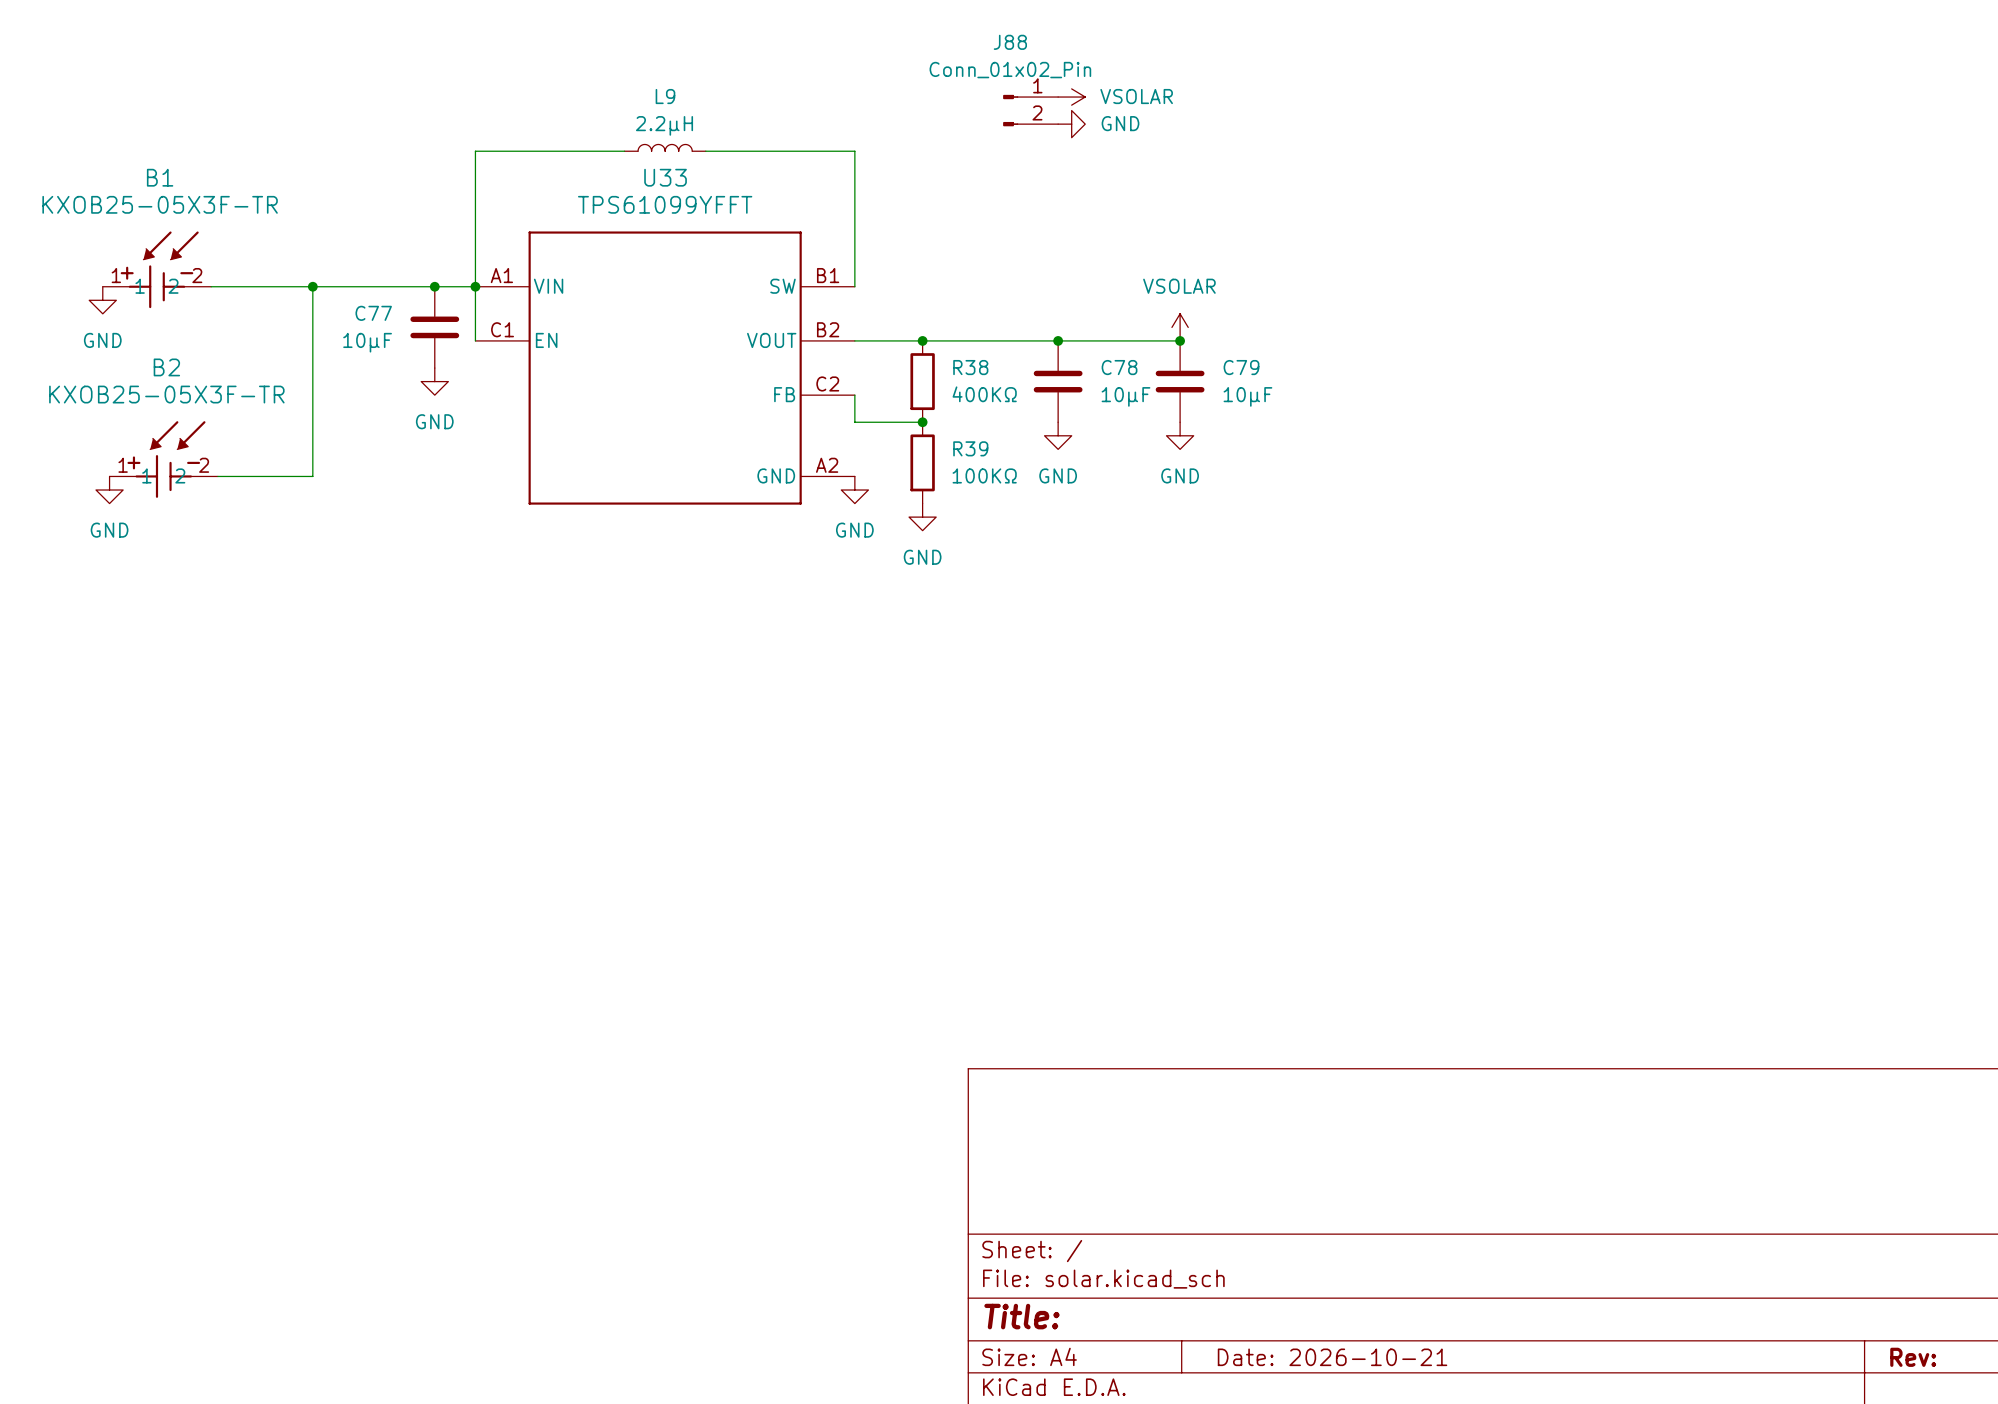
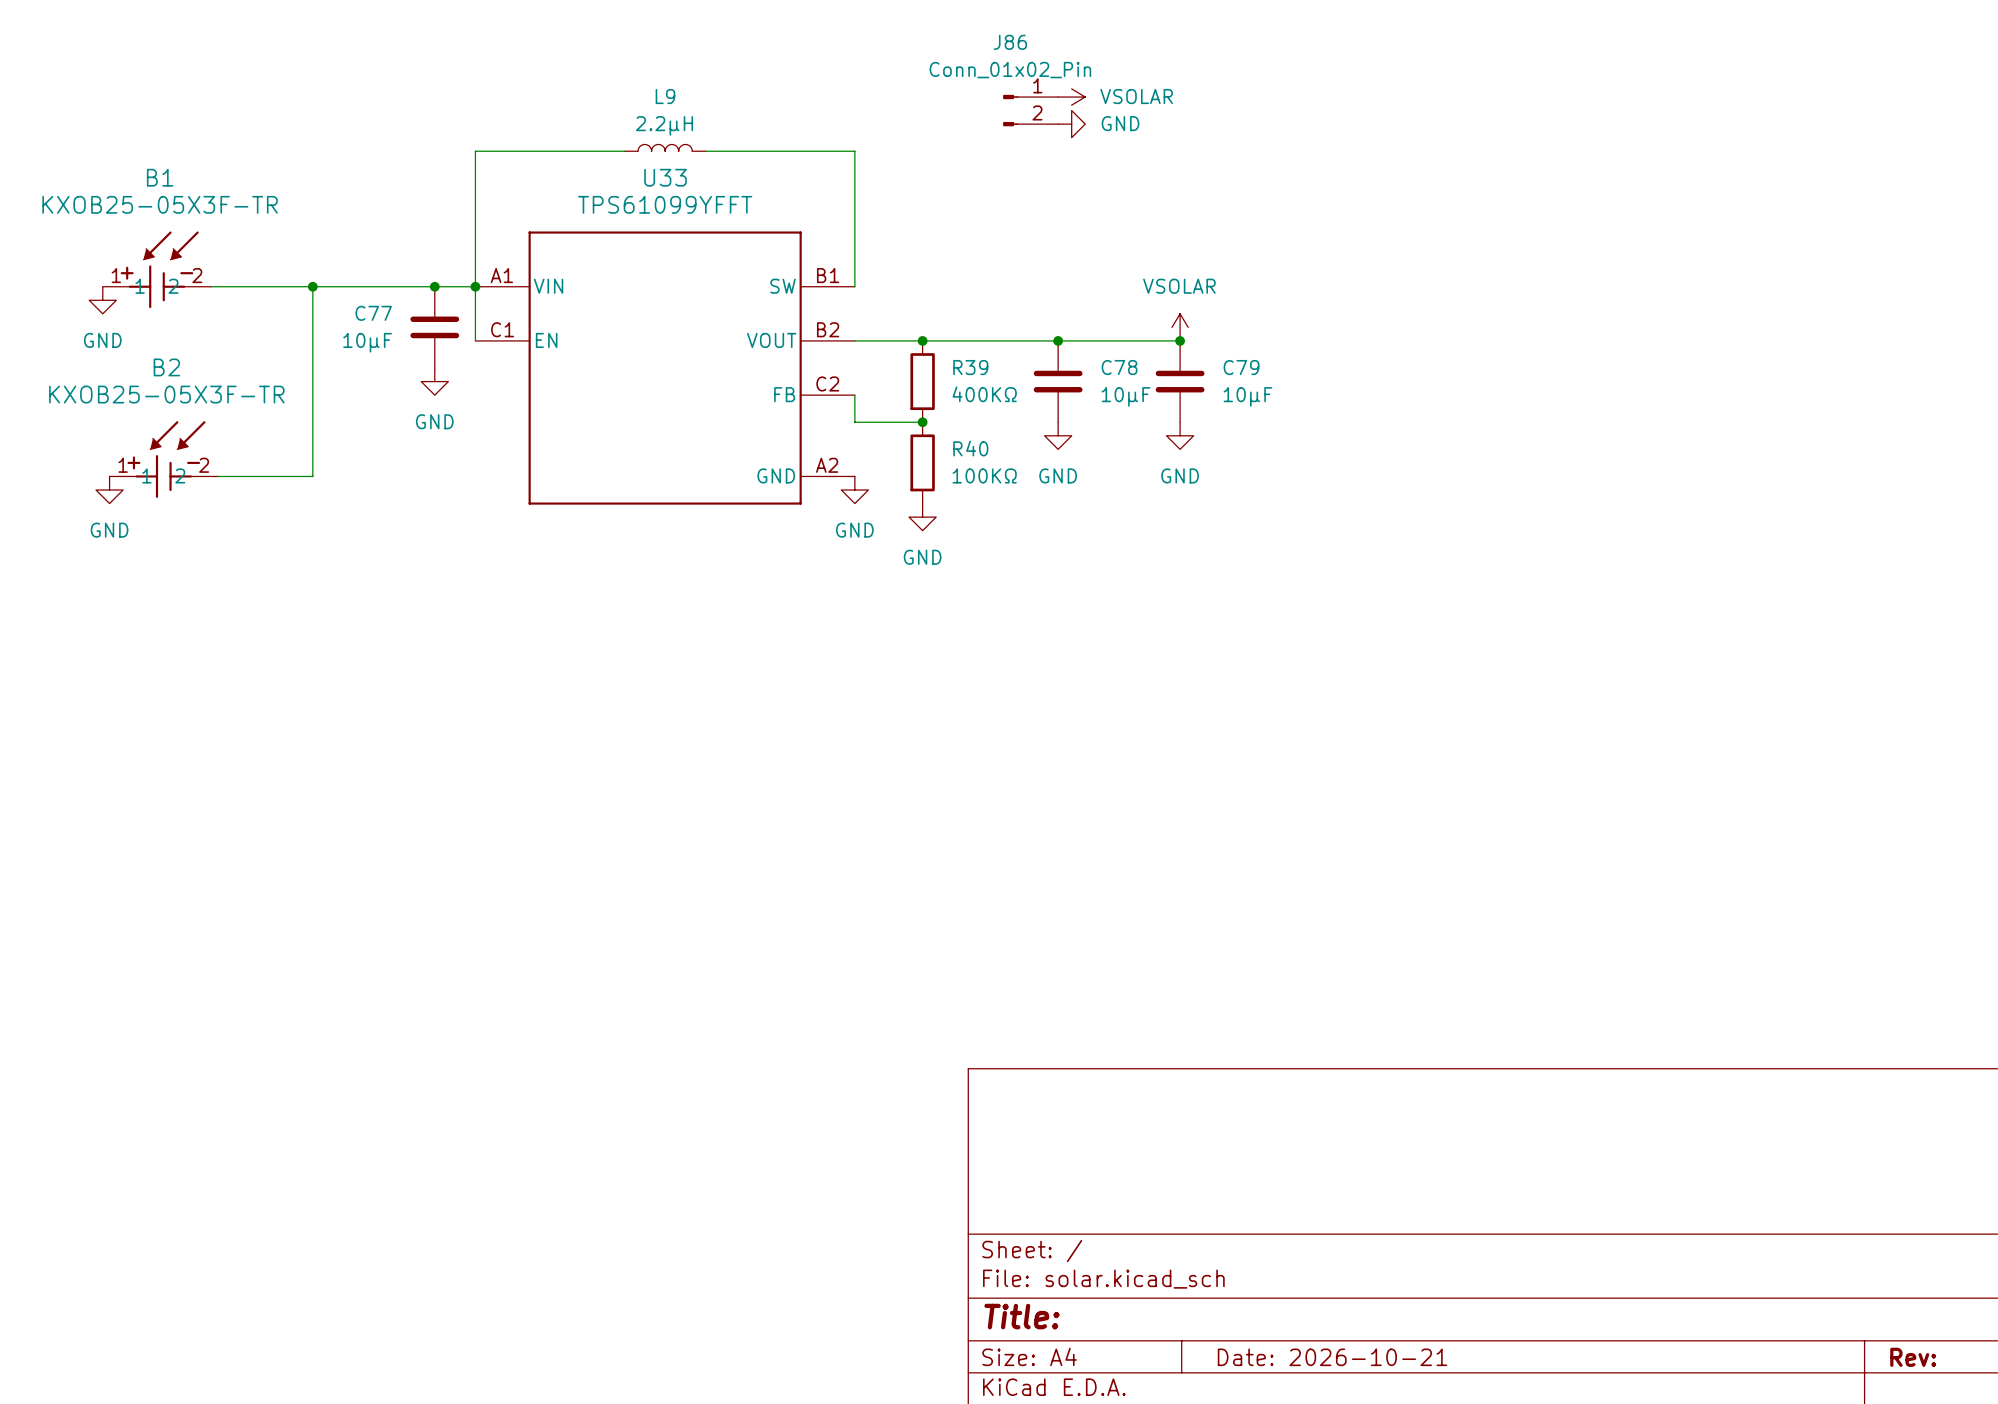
J88 name: J88 (1010, 42) -> J86 (1010, 42)
R38 name: R38 (970, 367) -> R39 (970, 367)
R39 name: R39 (970, 448) -> R40 (970, 448)

